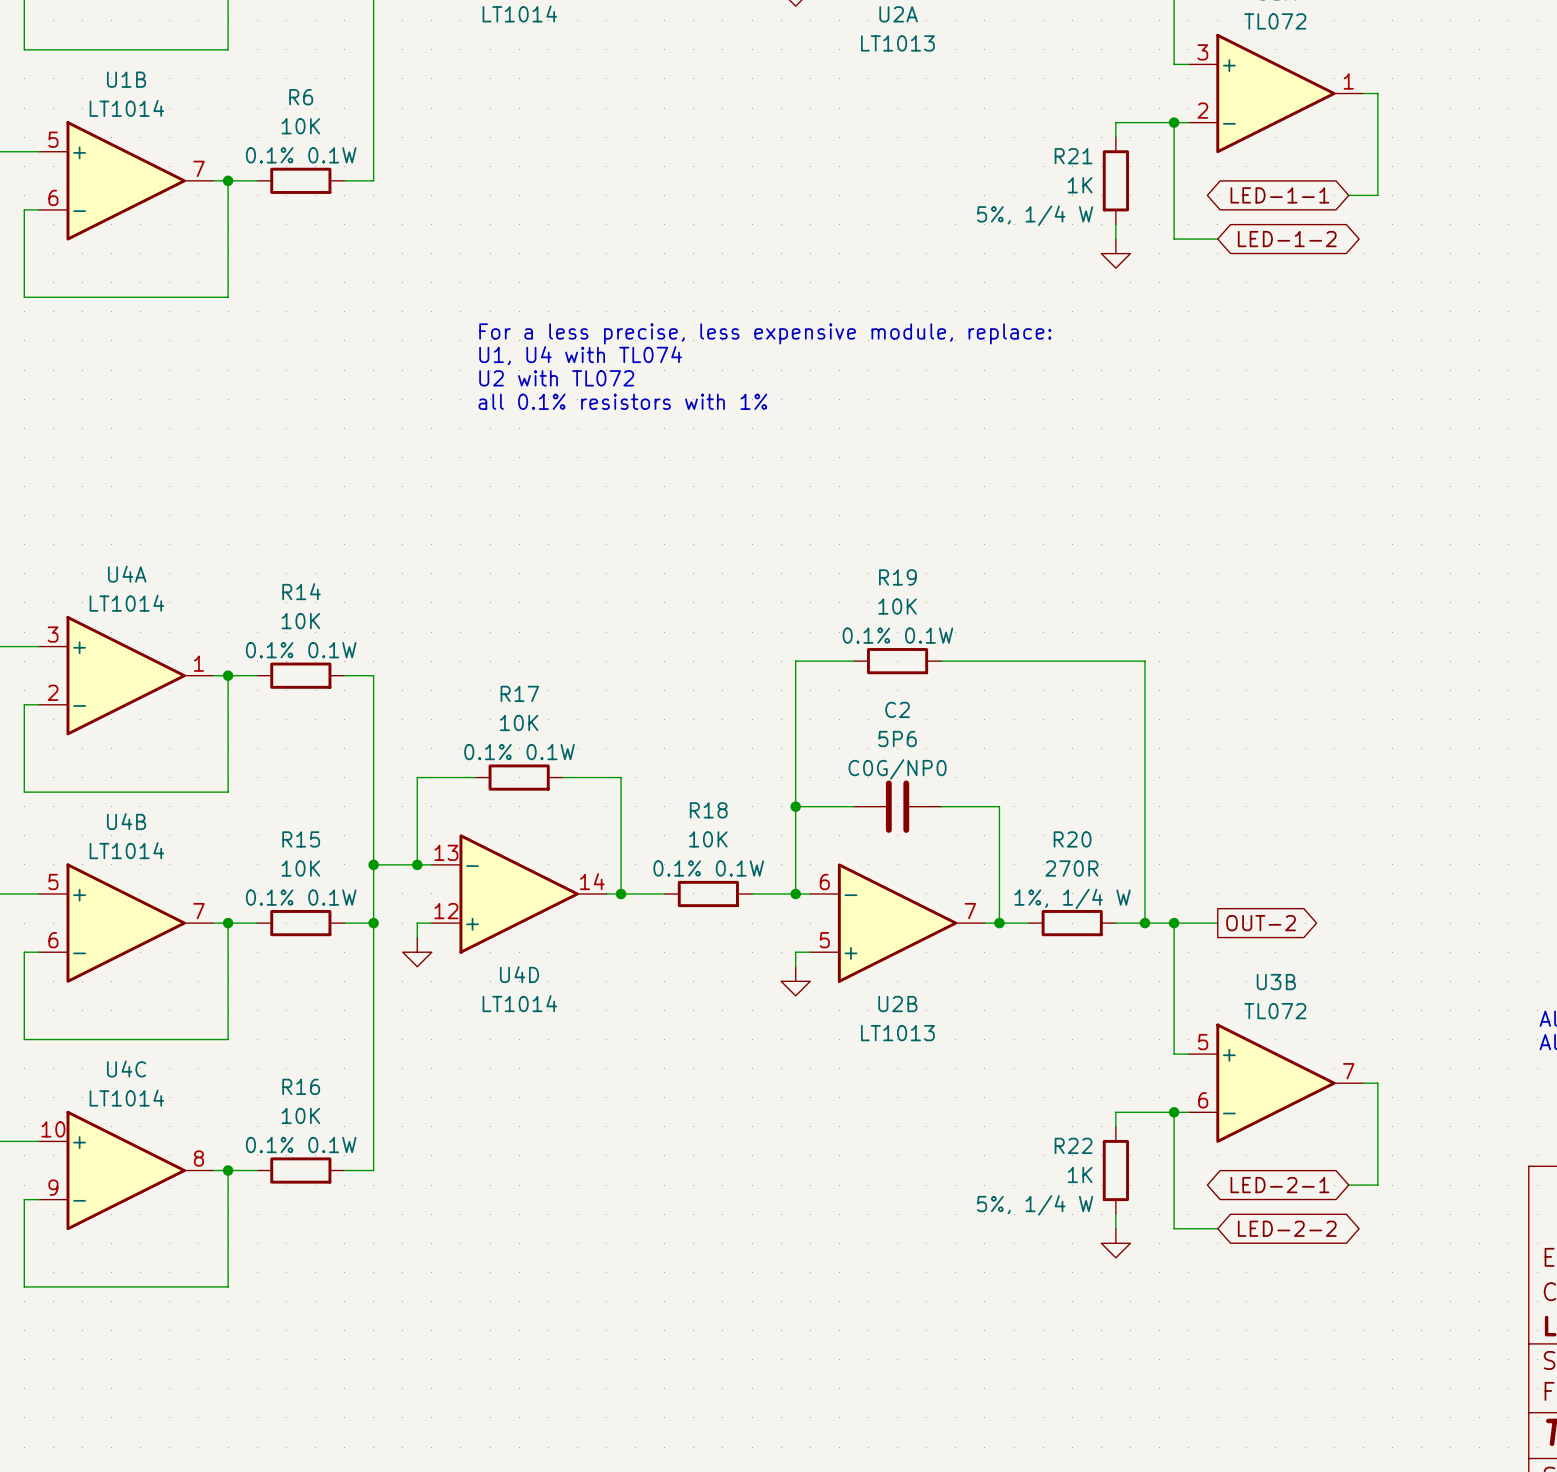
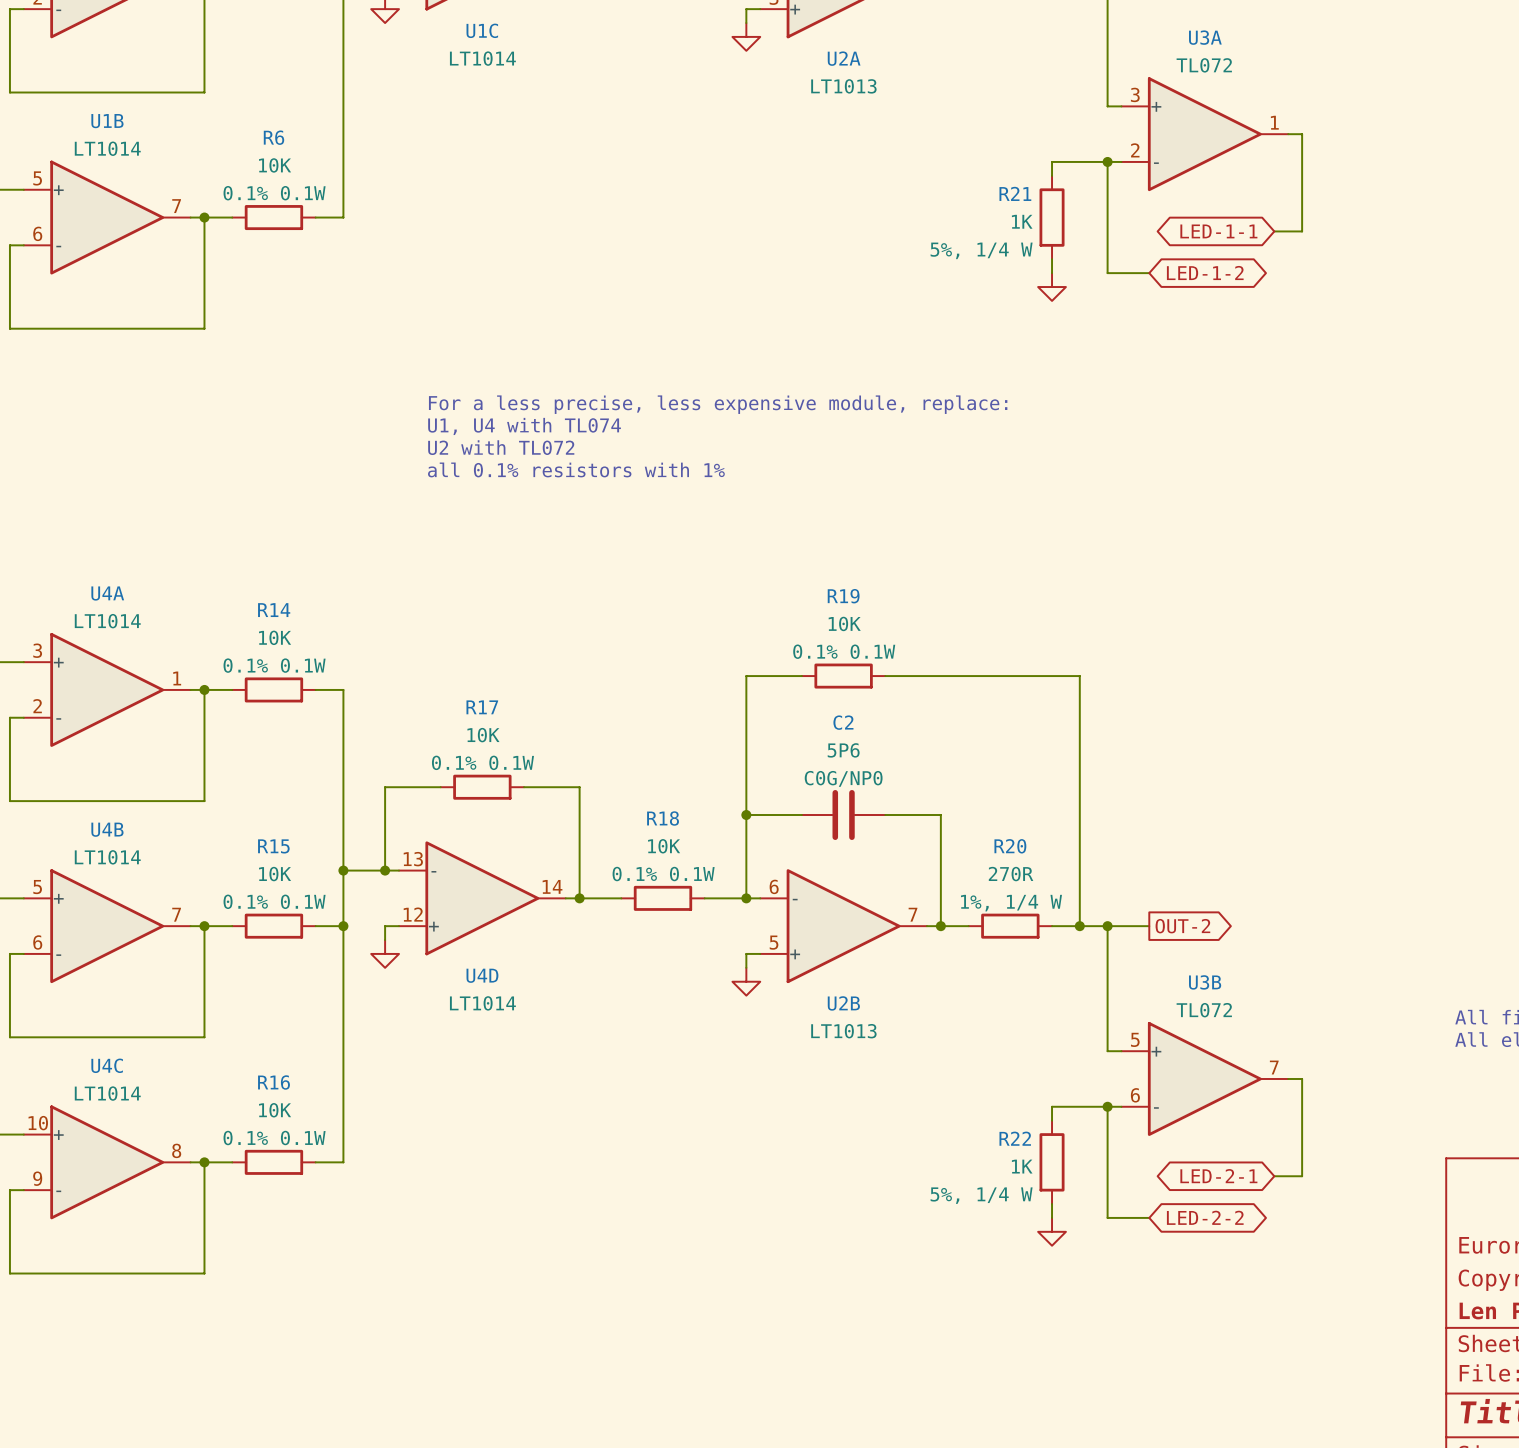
text position: For a less precise, less expensive module, replace: (765, 333) -> For a less precise, less expensive module, replace: (718, 404)
text position: U1, U4 with TL074 (580, 355) -> U1, U4 with TL074 (524, 426)
text position: U2 with TL072 (556, 378) -> U2 with TL072 (501, 447)
text position: all 0.1% resistors with 1% (622, 401) -> all 0.1% resistors with 1% (576, 469)

